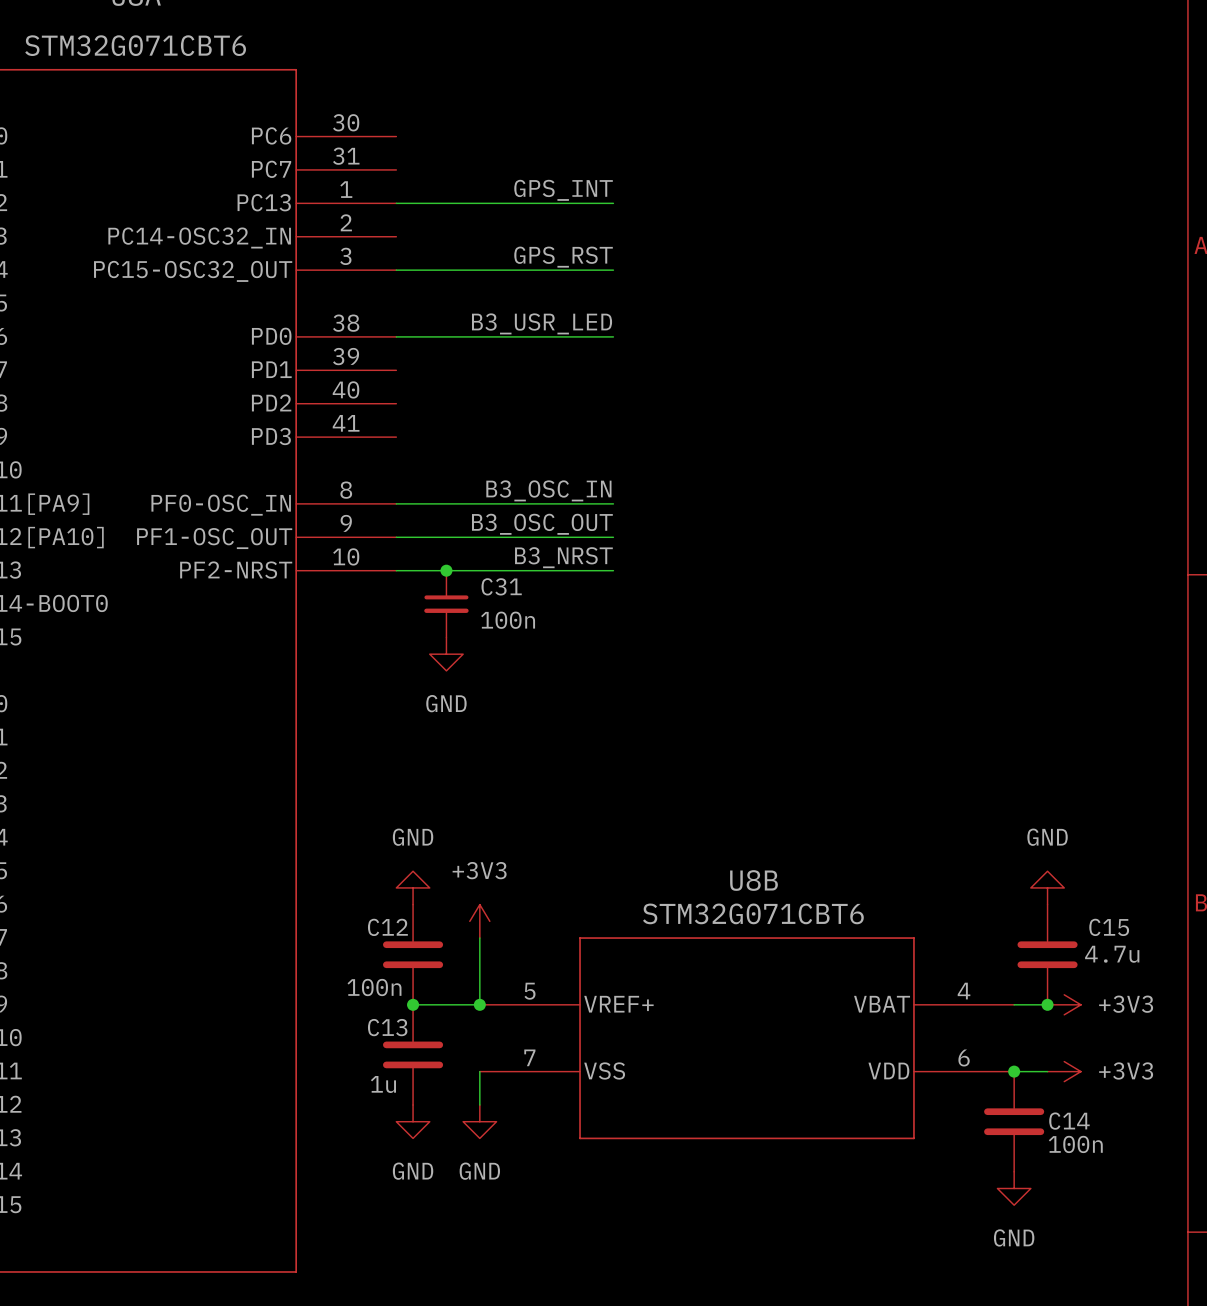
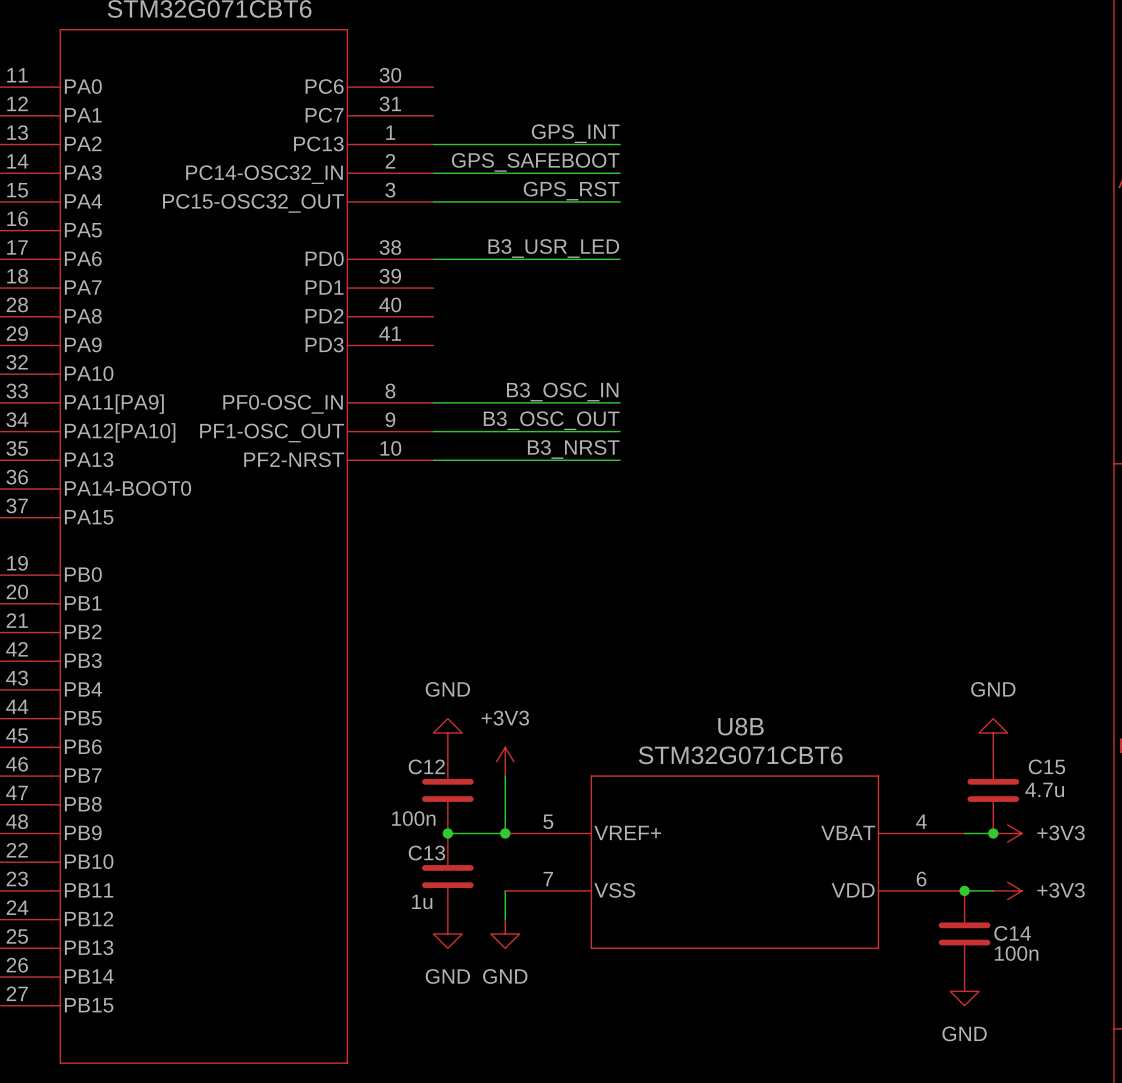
label: none -> GPS_SAFEBOOT (535, 162)
wire: none -> (433, 173) (620, 173)
junction: (446, 570) -> none
C31: 100n (446, 604) -> none
power symbol: GND (446, 654) -> none

